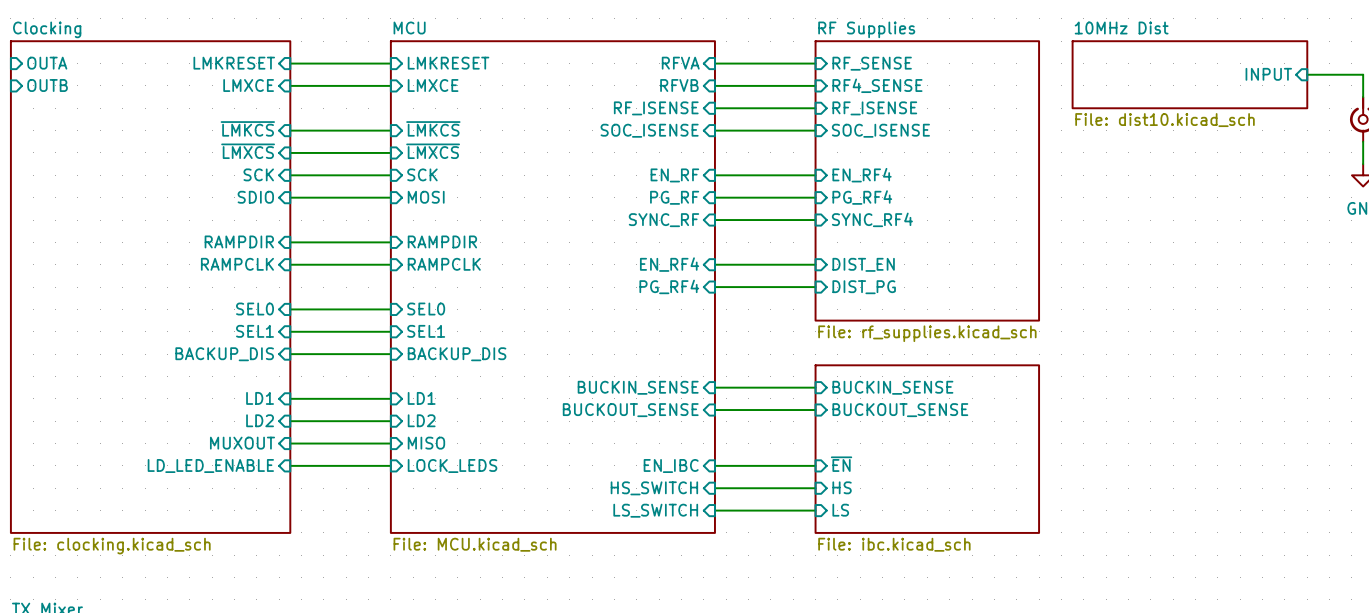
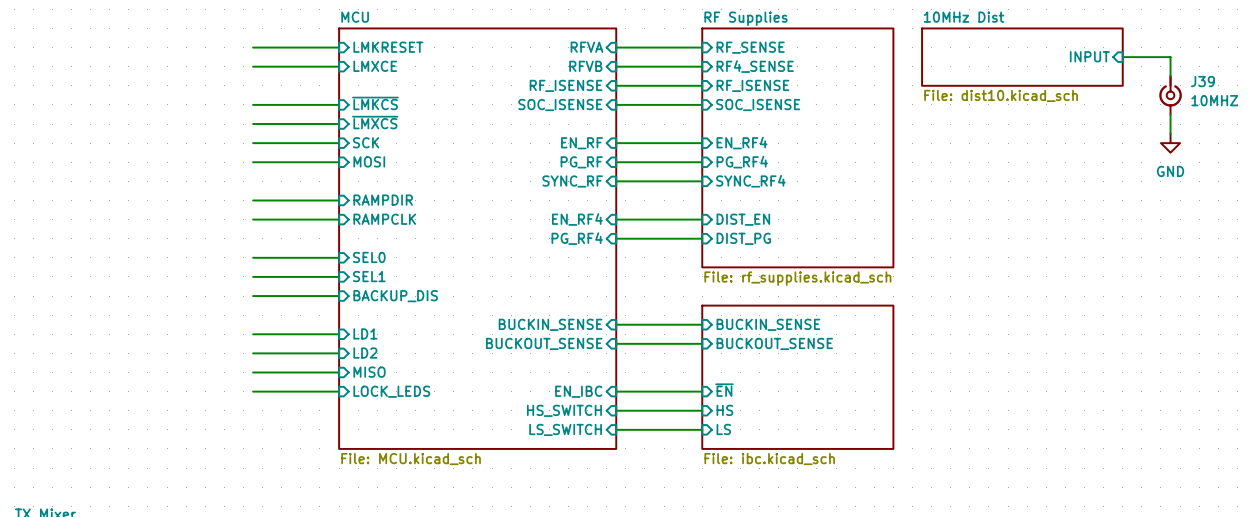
sheet pin: OUTA (47, 63) -> none
sheet pin: LMKRESET (234, 63) -> none
sheet pin: OUTB (47, 85) -> none
sheet pin: LMXCE (248, 85) -> none
sheet pin: ~{LMKCS} (247, 128) -> none
sheet pin: ~{LMXCS} (248, 151) -> none
sheet pin: SCK (258, 174) -> none
sheet pin: SDIO (255, 197) -> none
sheet pin: RAMPDIR (239, 241) -> none
sheet pin: RAMPCLK (237, 264) -> none
sheet Clocking: File: clocking.kicad_sch (150, 287) -> none
sheet pin: SEL0 (255, 309) -> none
sheet pin: SEL1 (255, 331) -> none
sheet pin: BACKUP_DIS (224, 354) -> none
sheet pin: LD1 (260, 398) -> none
sheet pin: LD2 (260, 420) -> none
sheet pin: MUXOUT (242, 443) -> none
sheet pin: LD_LED_ENABLE (210, 466) -> none

